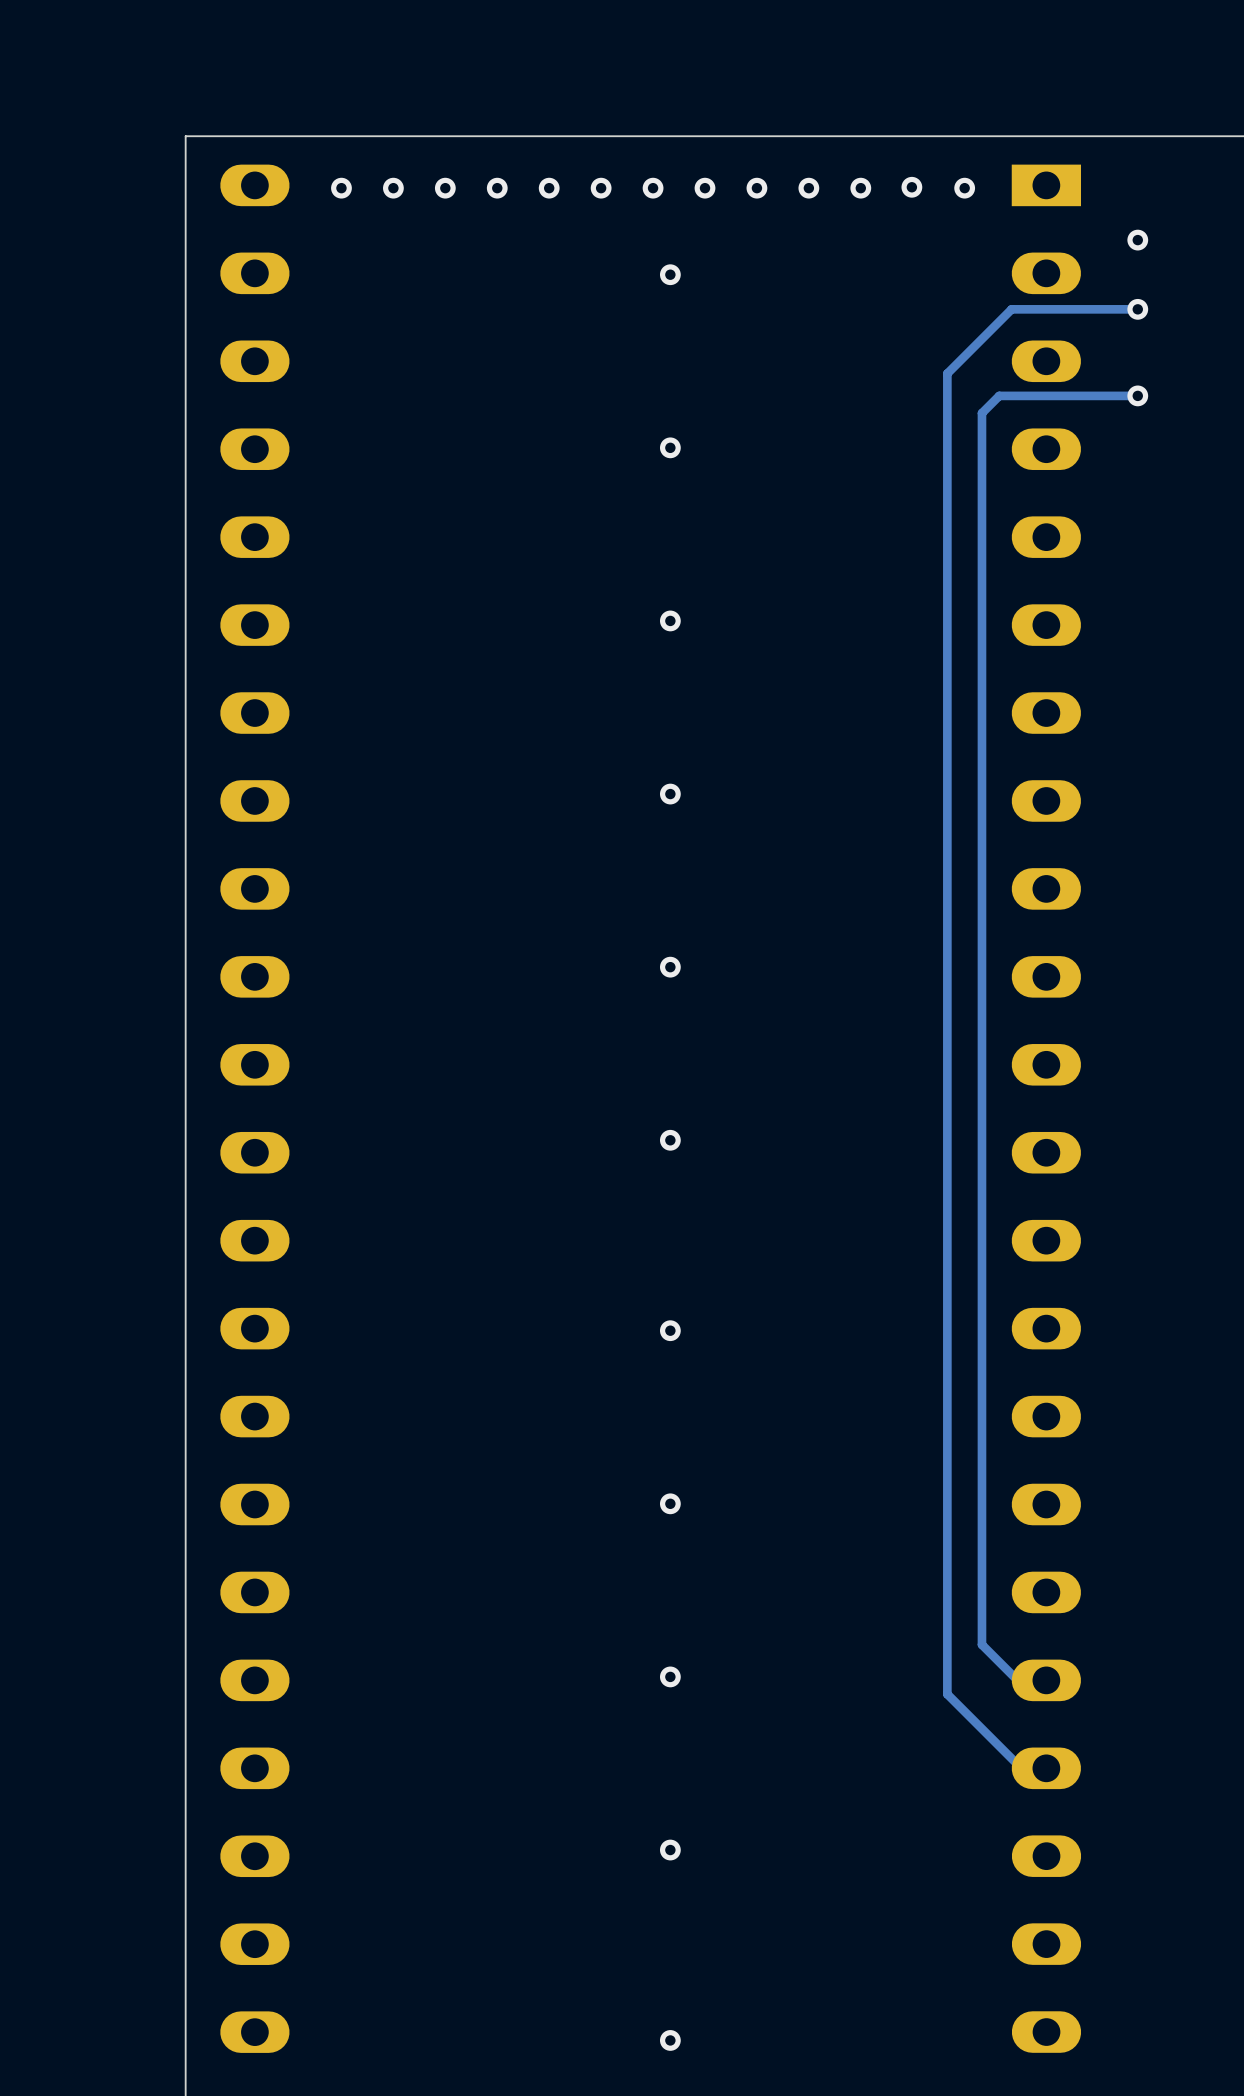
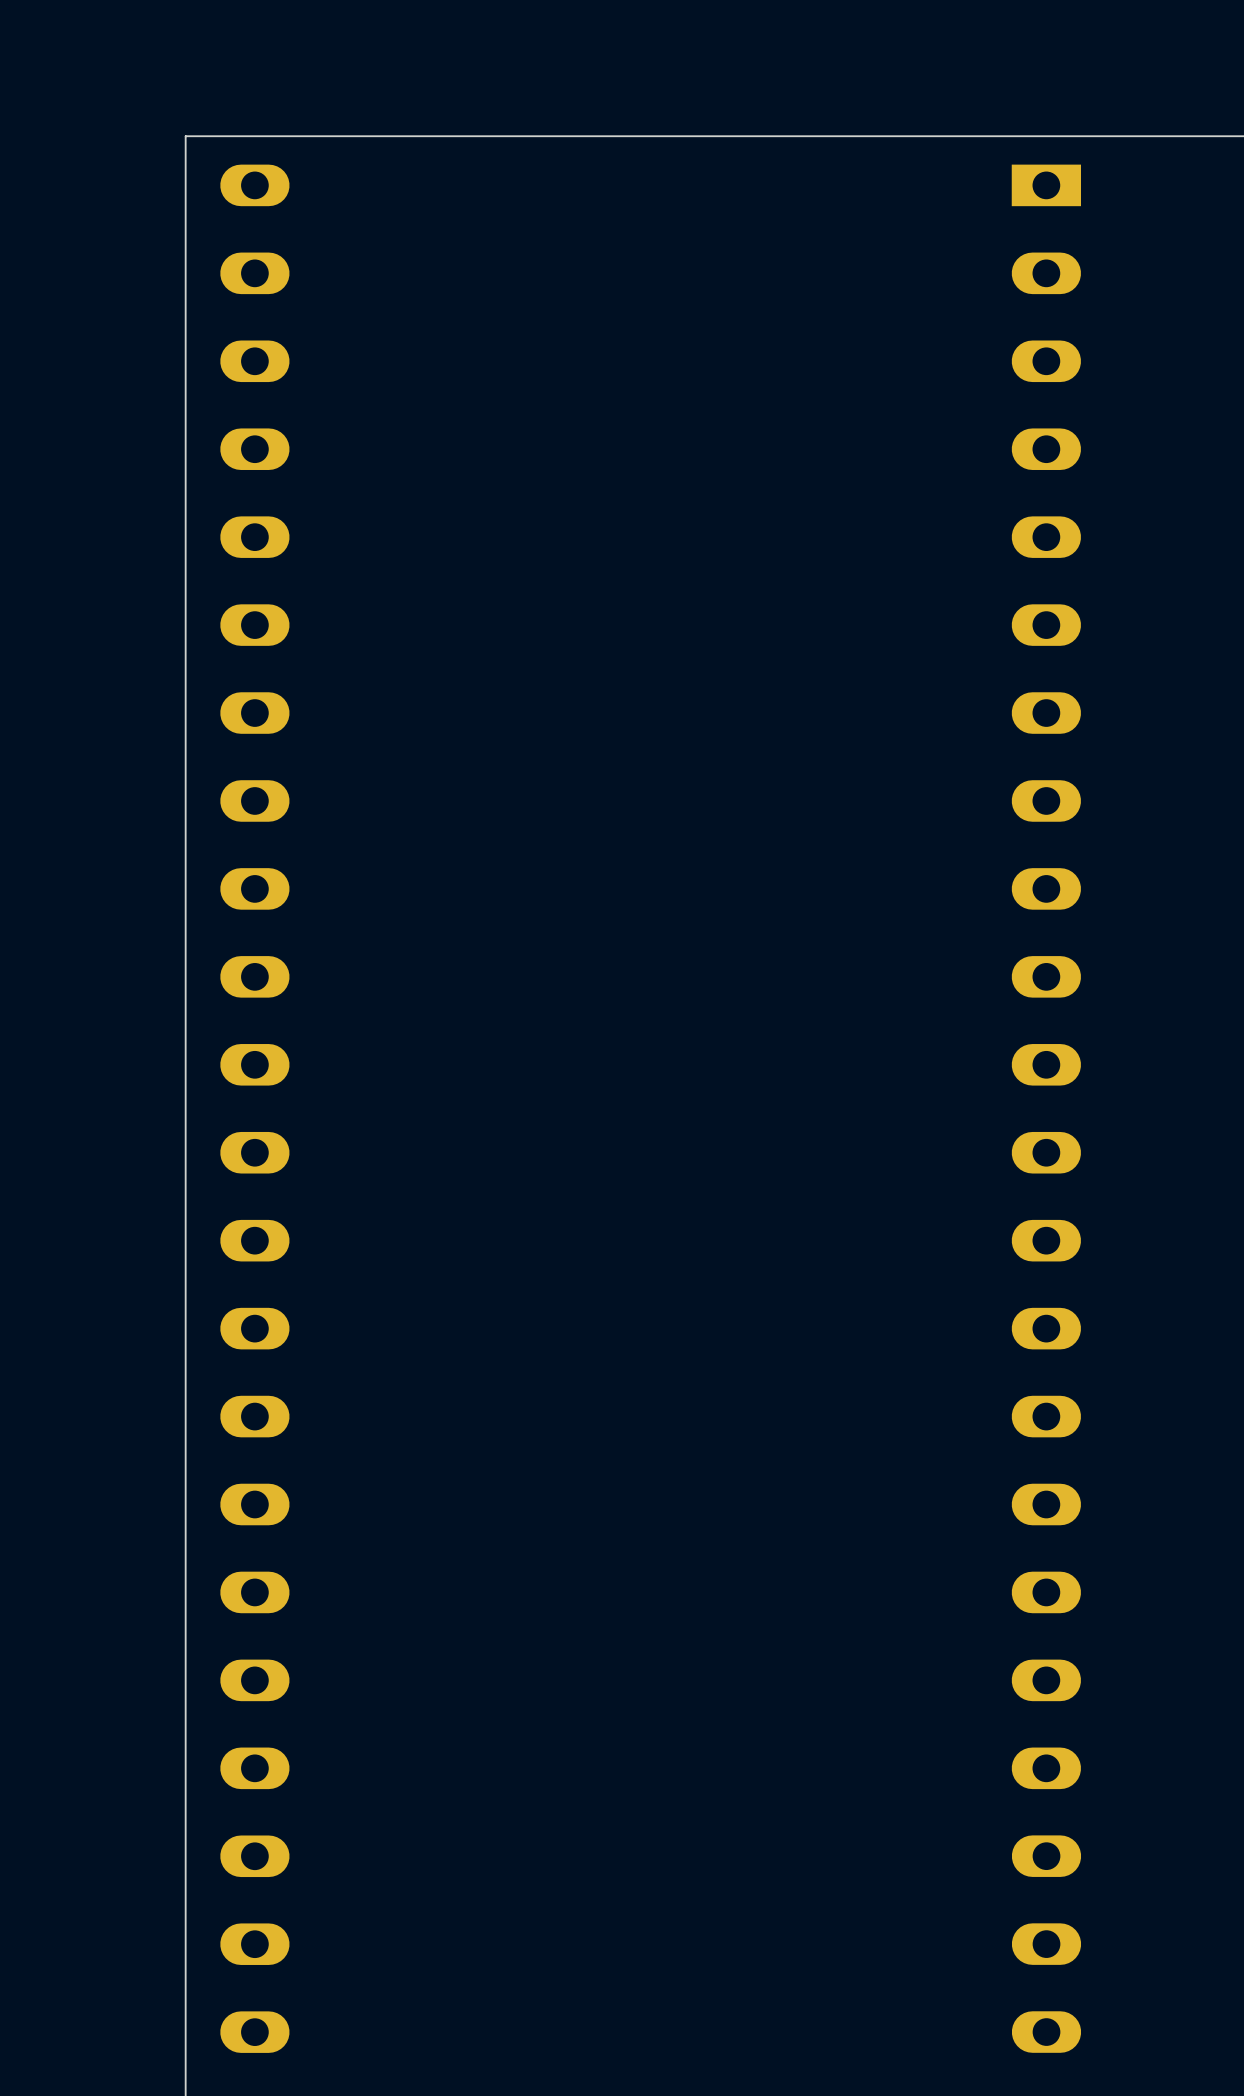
via: (911, 187) -> none
via: (341, 188) -> none
via: (393, 188) -> none
via: (445, 188) -> none
via: (497, 188) -> none
via: (549, 188) -> none
via: (601, 188) -> none
via: (653, 188) -> none
via: (705, 188) -> none
via: (756, 188) -> none
via: (808, 188) -> none
via: (860, 188) -> none
via: (964, 188) -> none
via: (1137, 240) -> none
via: (670, 274) -> none
track: (1137, 309) (1011, 309) (947, 373) (947, 1694) (1021, 1768) (1046, 1768) -> none
via: (1137, 309) -> none
track: (1137, 395) (999, 395) (981, 413) (981, 1644) (1017, 1680) (1046, 1680) -> none
via: (1137, 395) -> none
via: (670, 447) -> none
via: (670, 620) -> none
via: (670, 794) -> none
via: (670, 967) -> none
via: (670, 1140) -> none
via: (670, 1330) -> none
via: (670, 1503) -> none
via: (670, 1676) -> none
via: (670, 1850) -> none
via: (670, 2040) -> none

